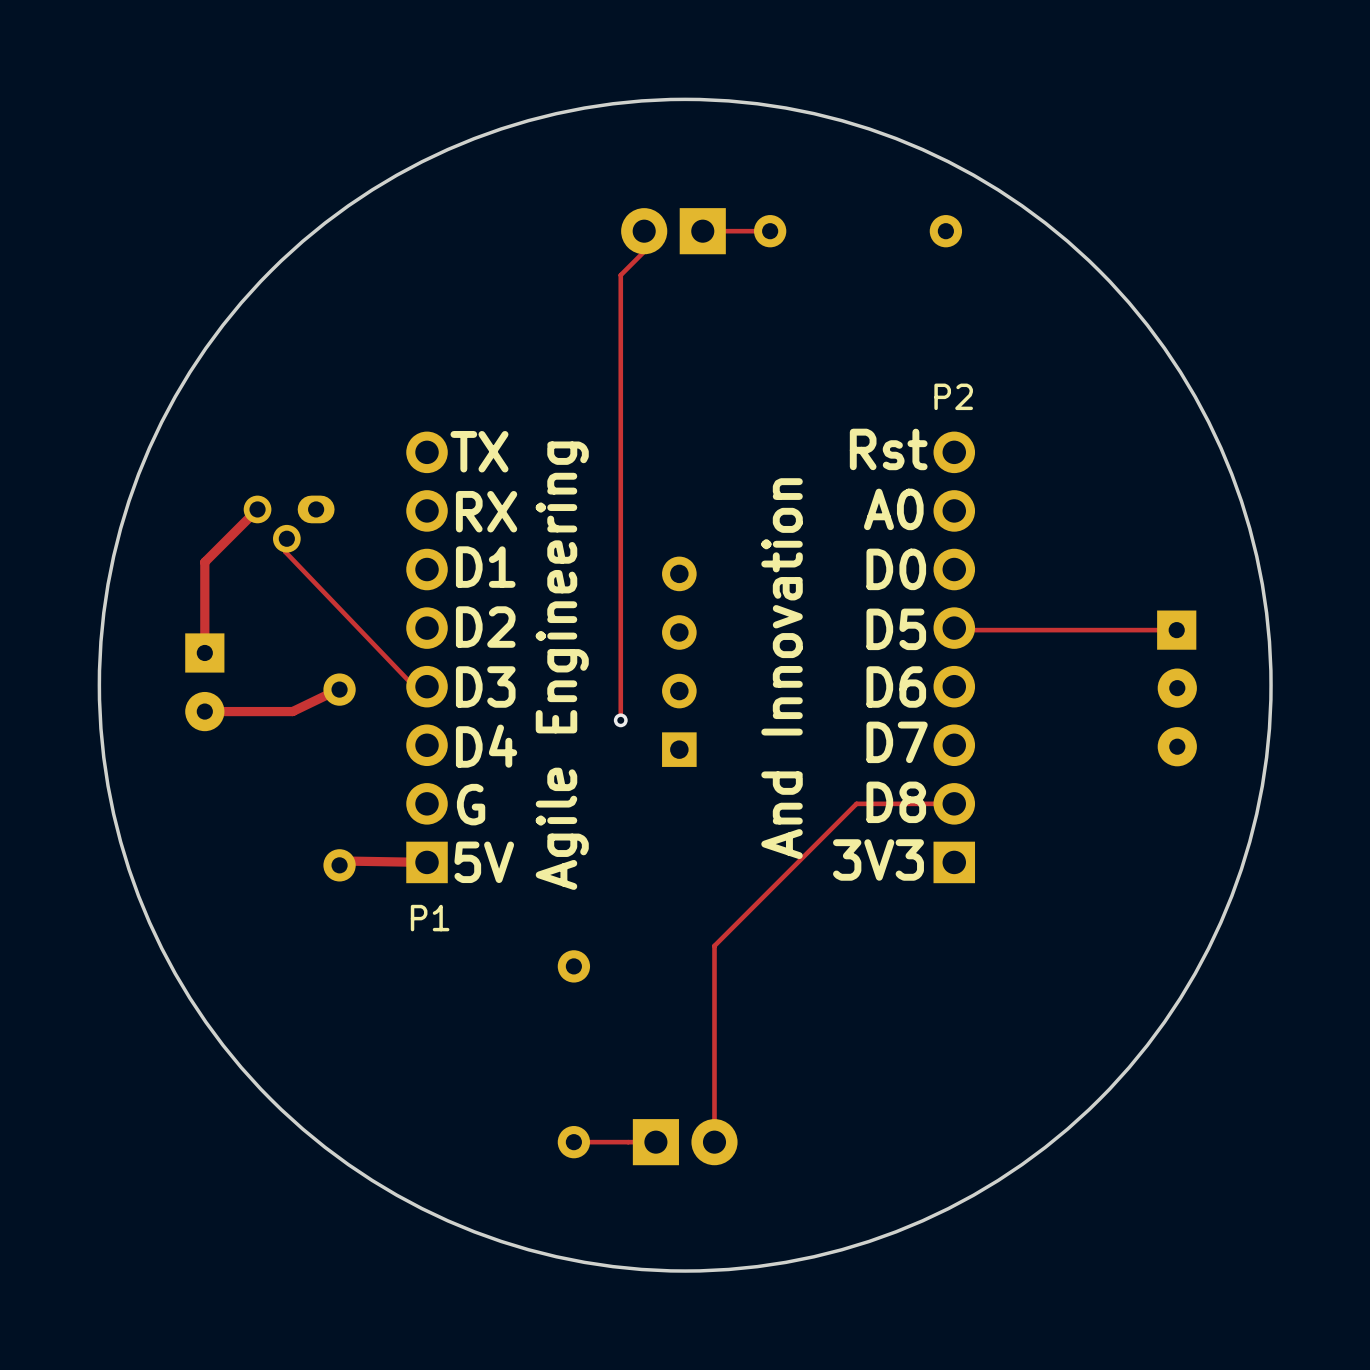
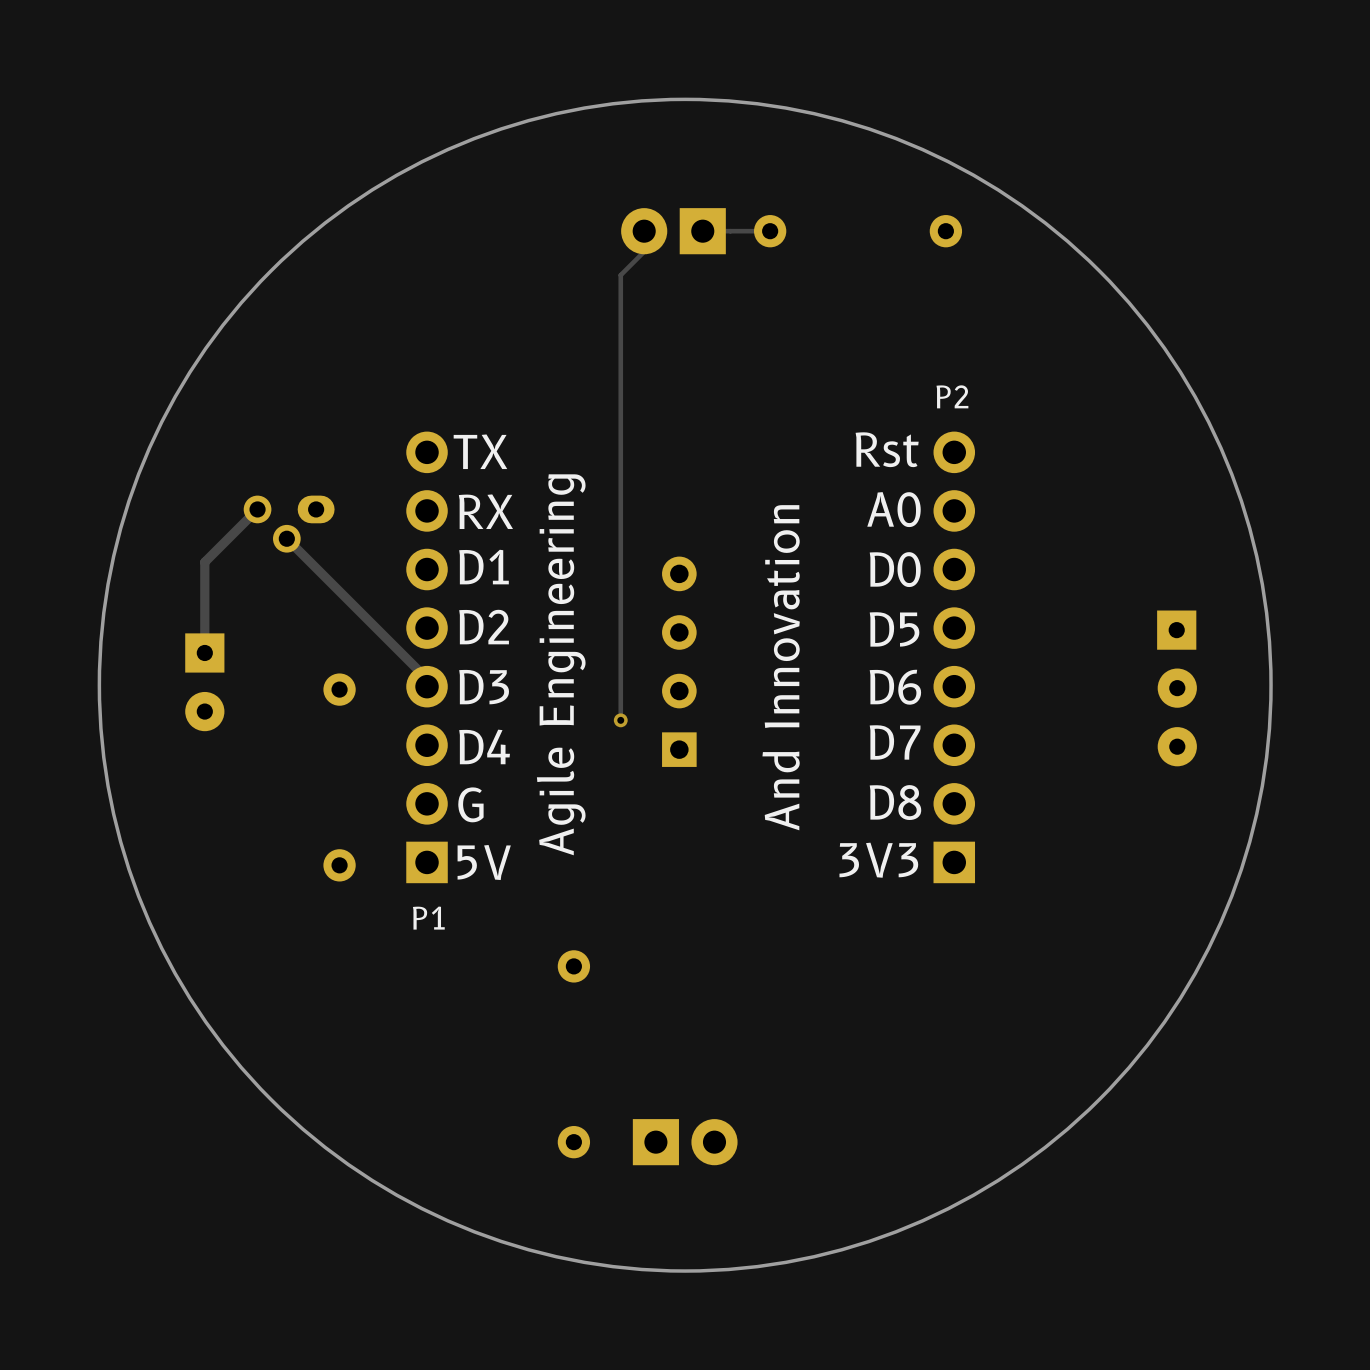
track: (286, 538) (285, 551) (414, 686) (427, 686) -> (286, 538) (427, 678) (427, 686)
track: (954, 628) (956, 630) (1176, 630) -> none
track: (335, 691) (292, 711) (204, 711) -> none
track: (954, 803) (856, 803) (714, 945) (714, 1142) -> none
track: (339, 860) (427, 862) -> none
track: (573, 1142) (655, 1142) -> none

